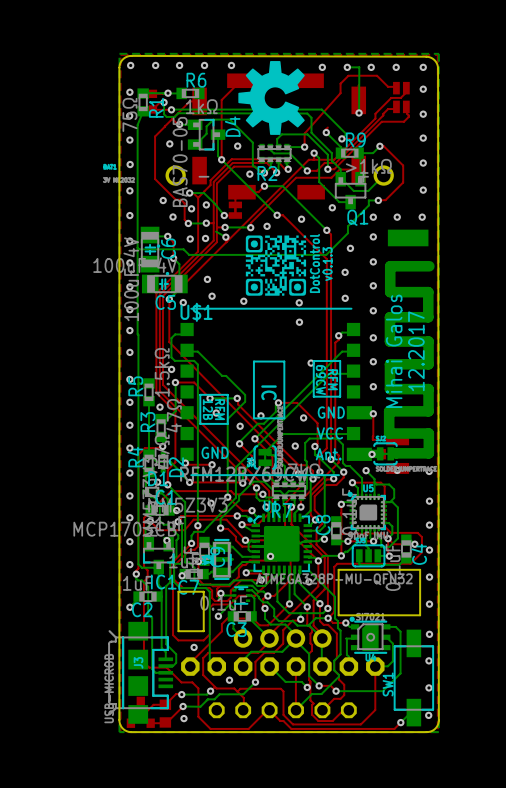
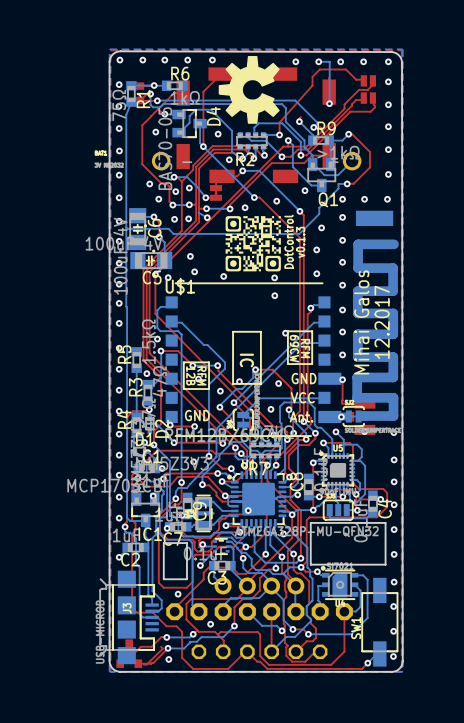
top track: none -> (161, 646) (162, 648) (146, 664) (143, 664)
part: (165, 713) -> none

